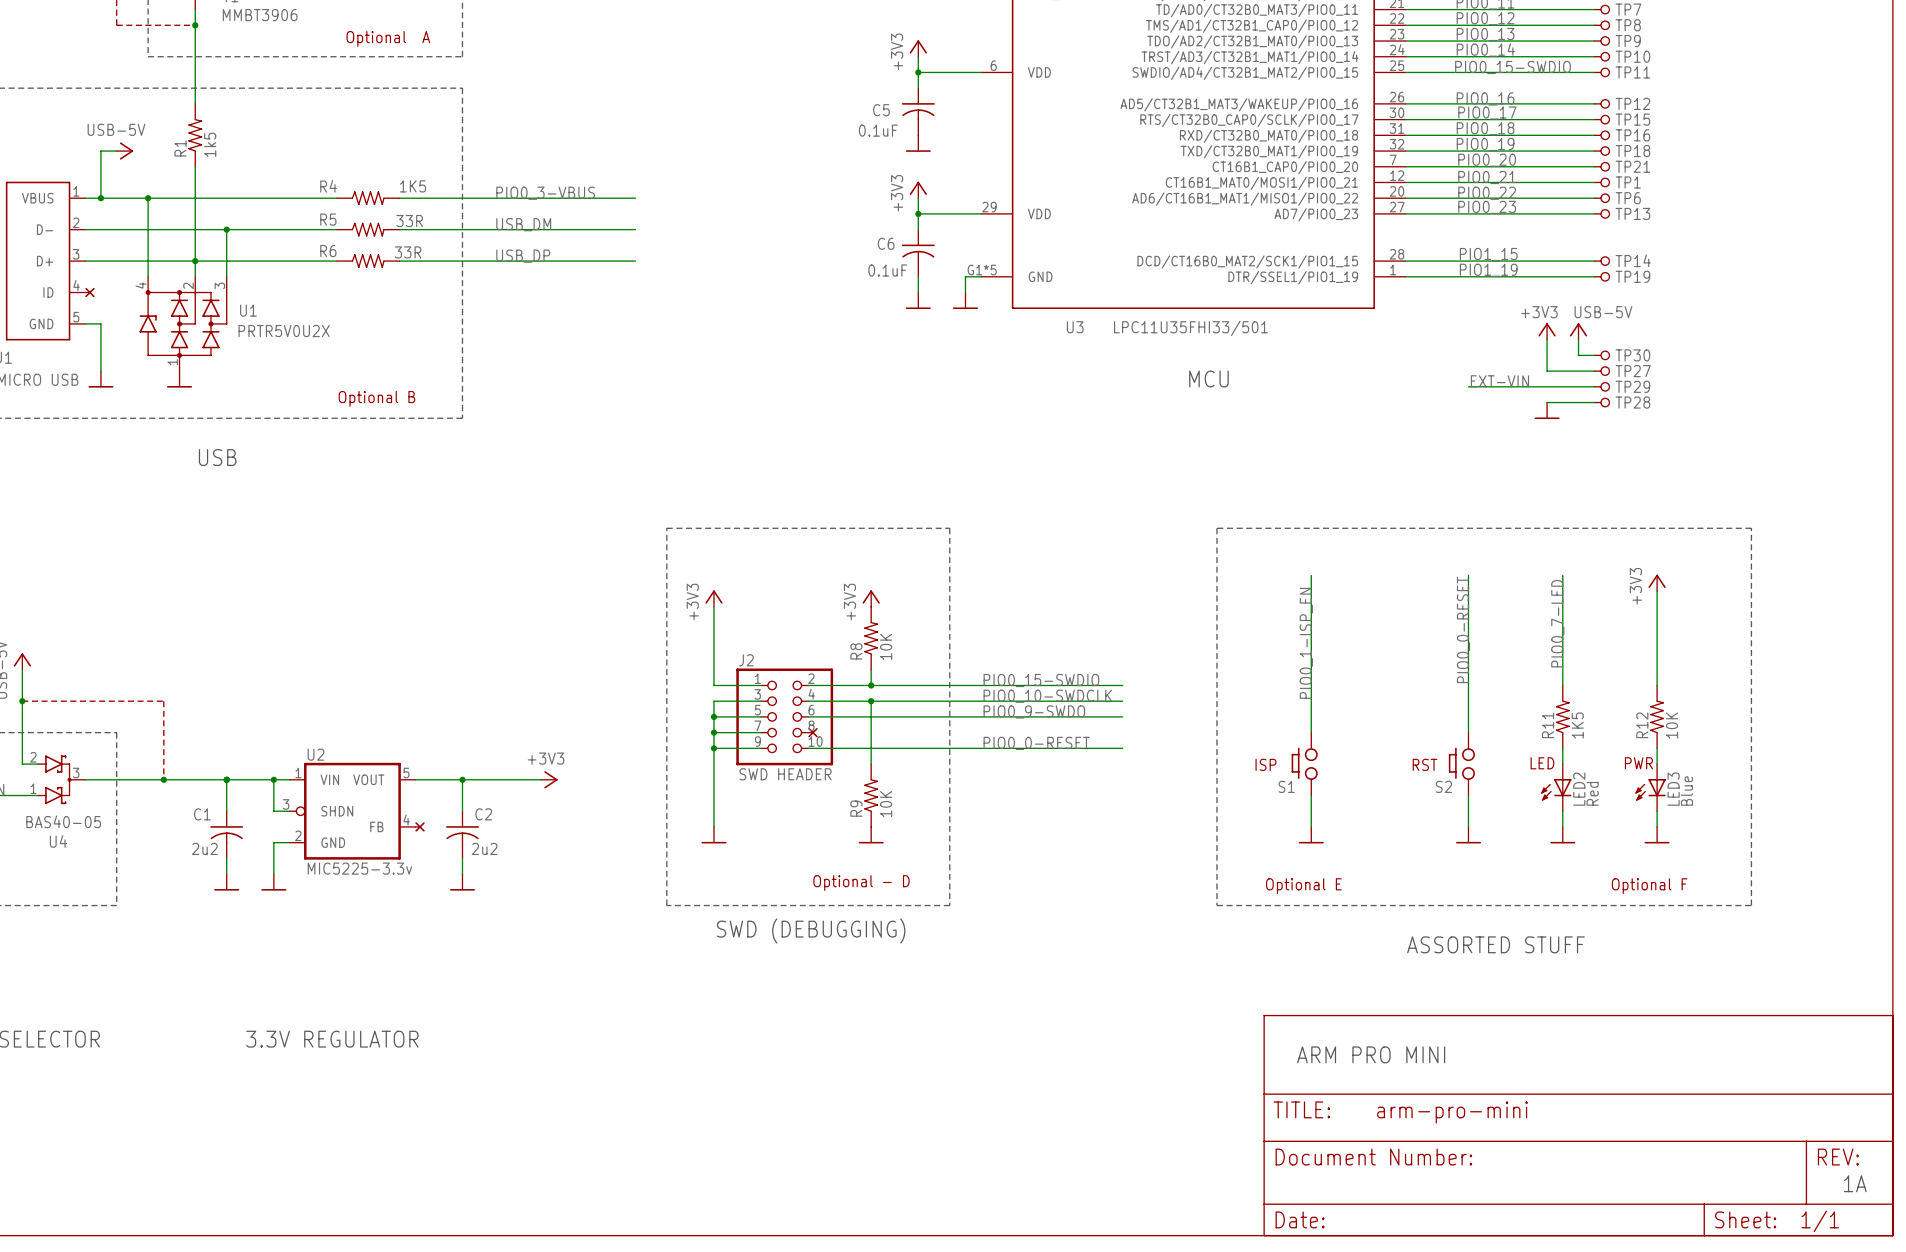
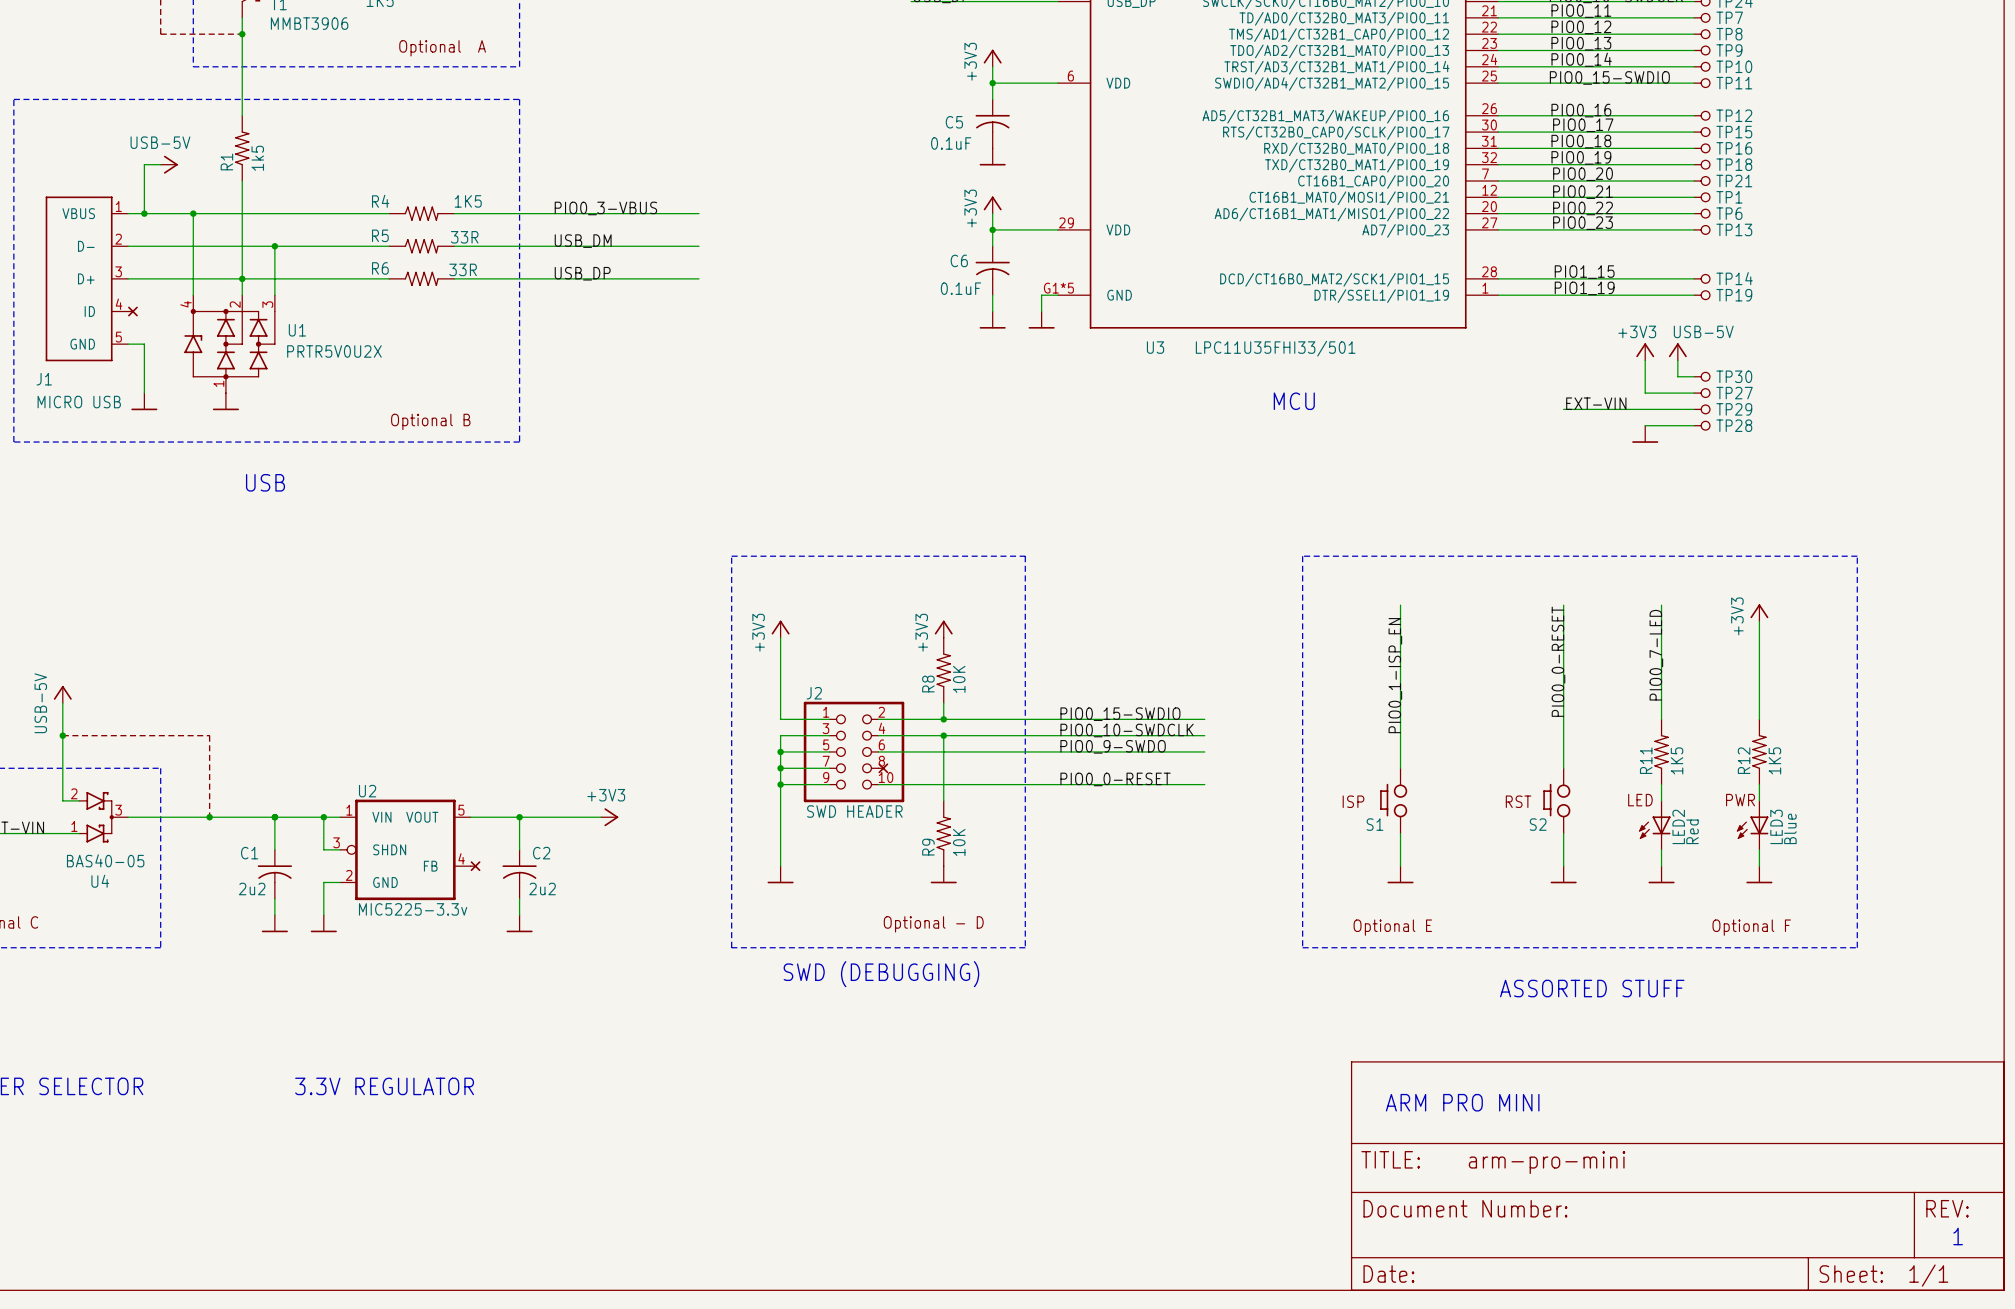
R12 value: 10K (1672, 725) -> 1K5 (1774, 760)
text: 1A (1855, 1183) -> 1 (1958, 1236)

